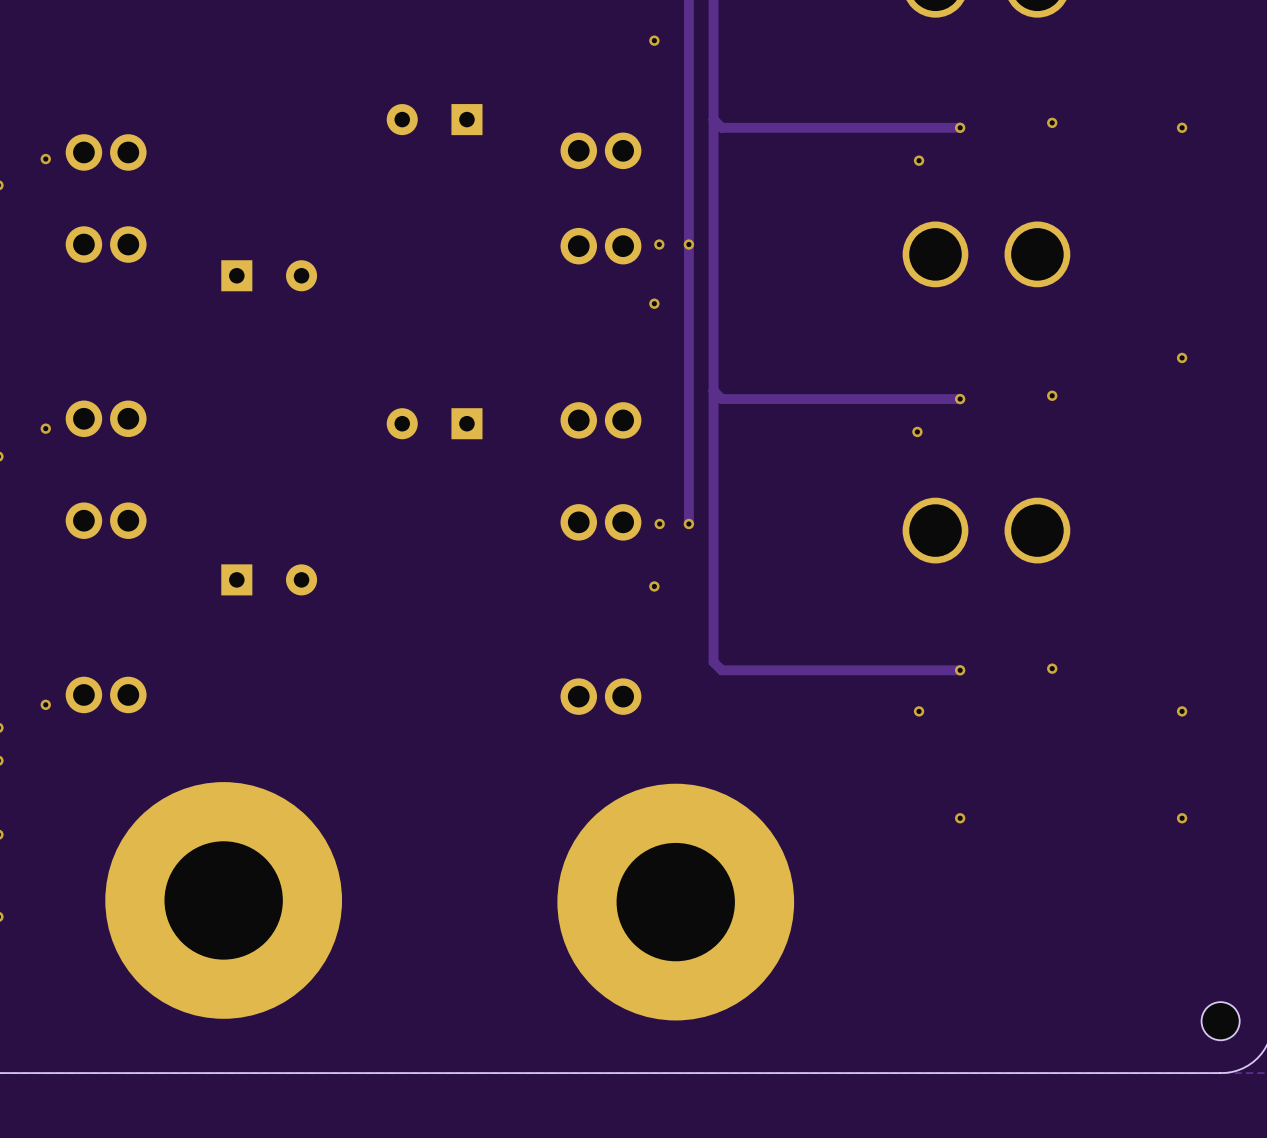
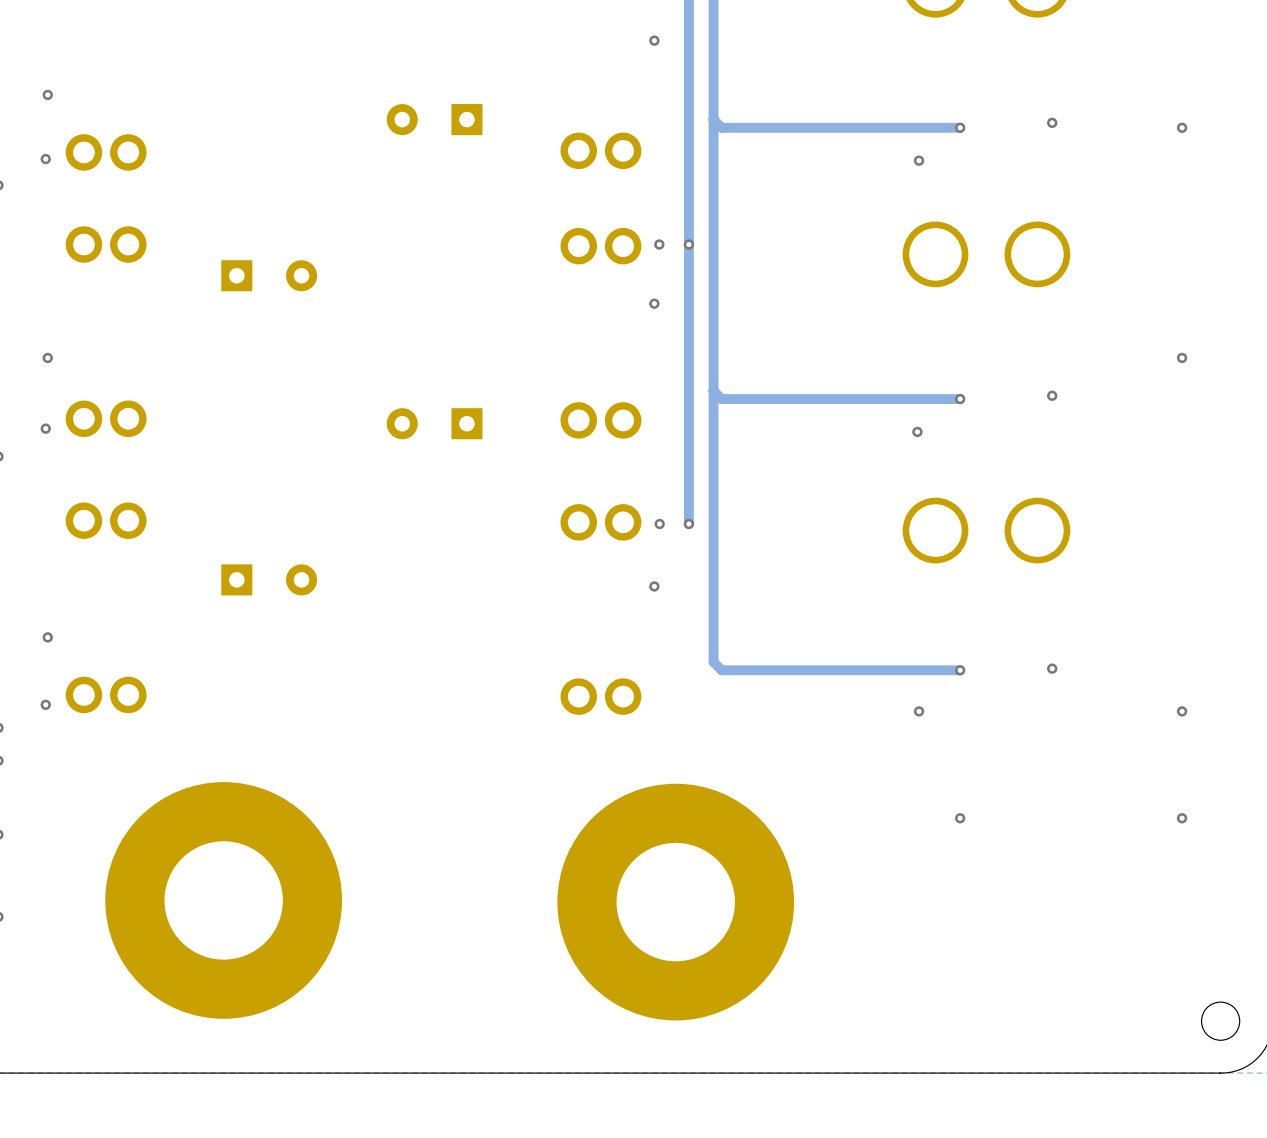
via: none -> (47, 94)
via: none -> (47, 357)
via: none -> (47, 637)

